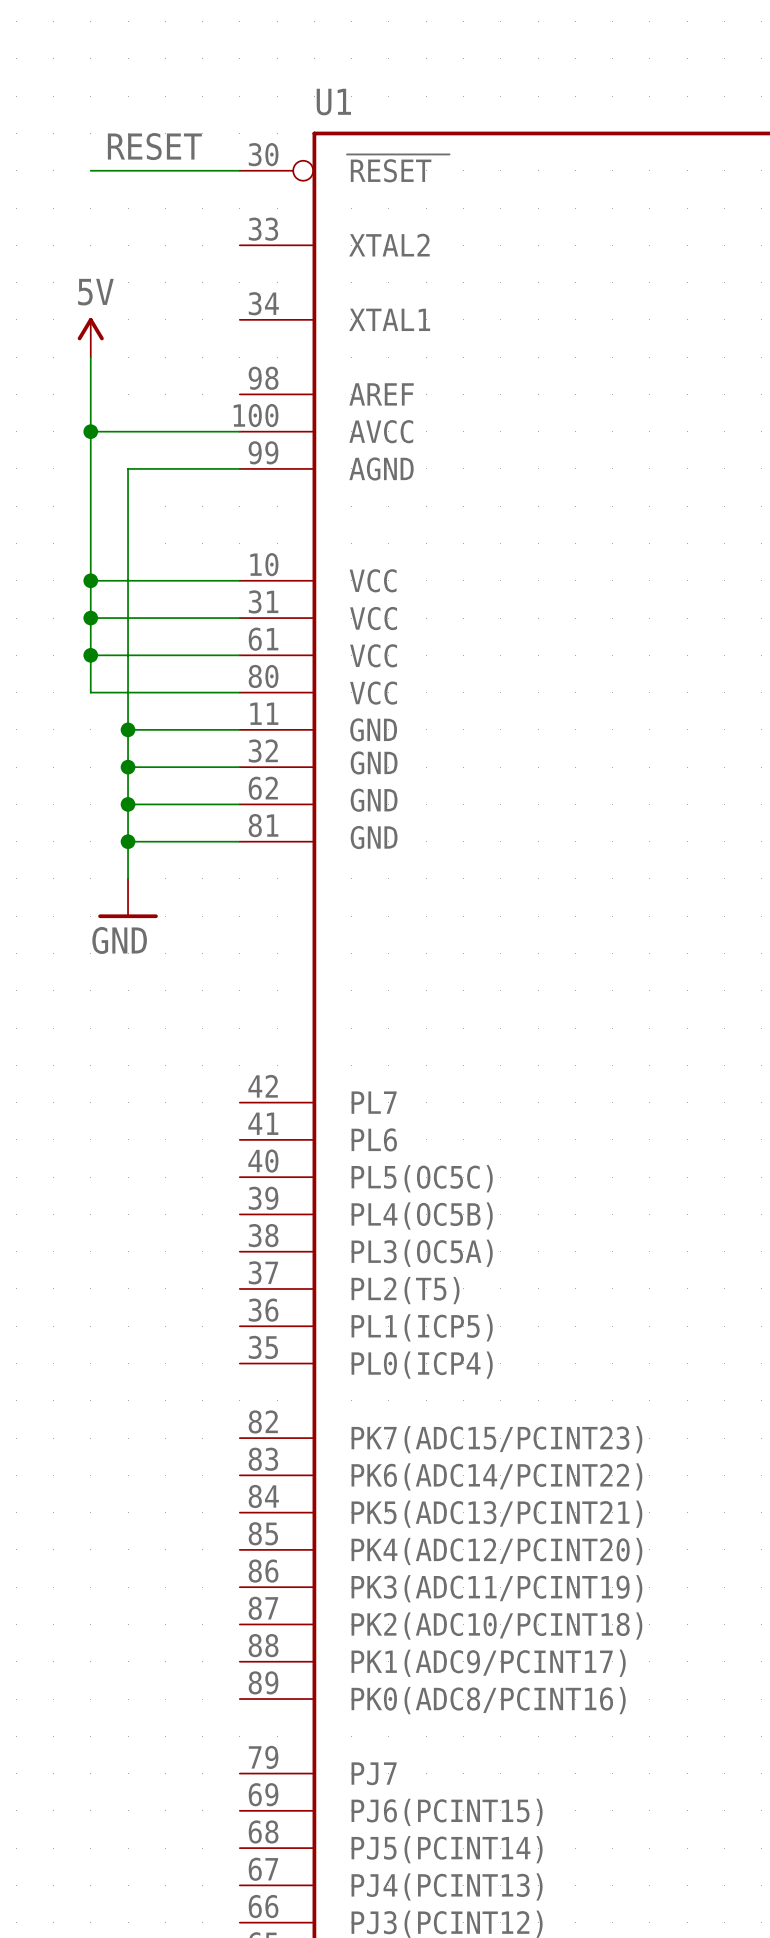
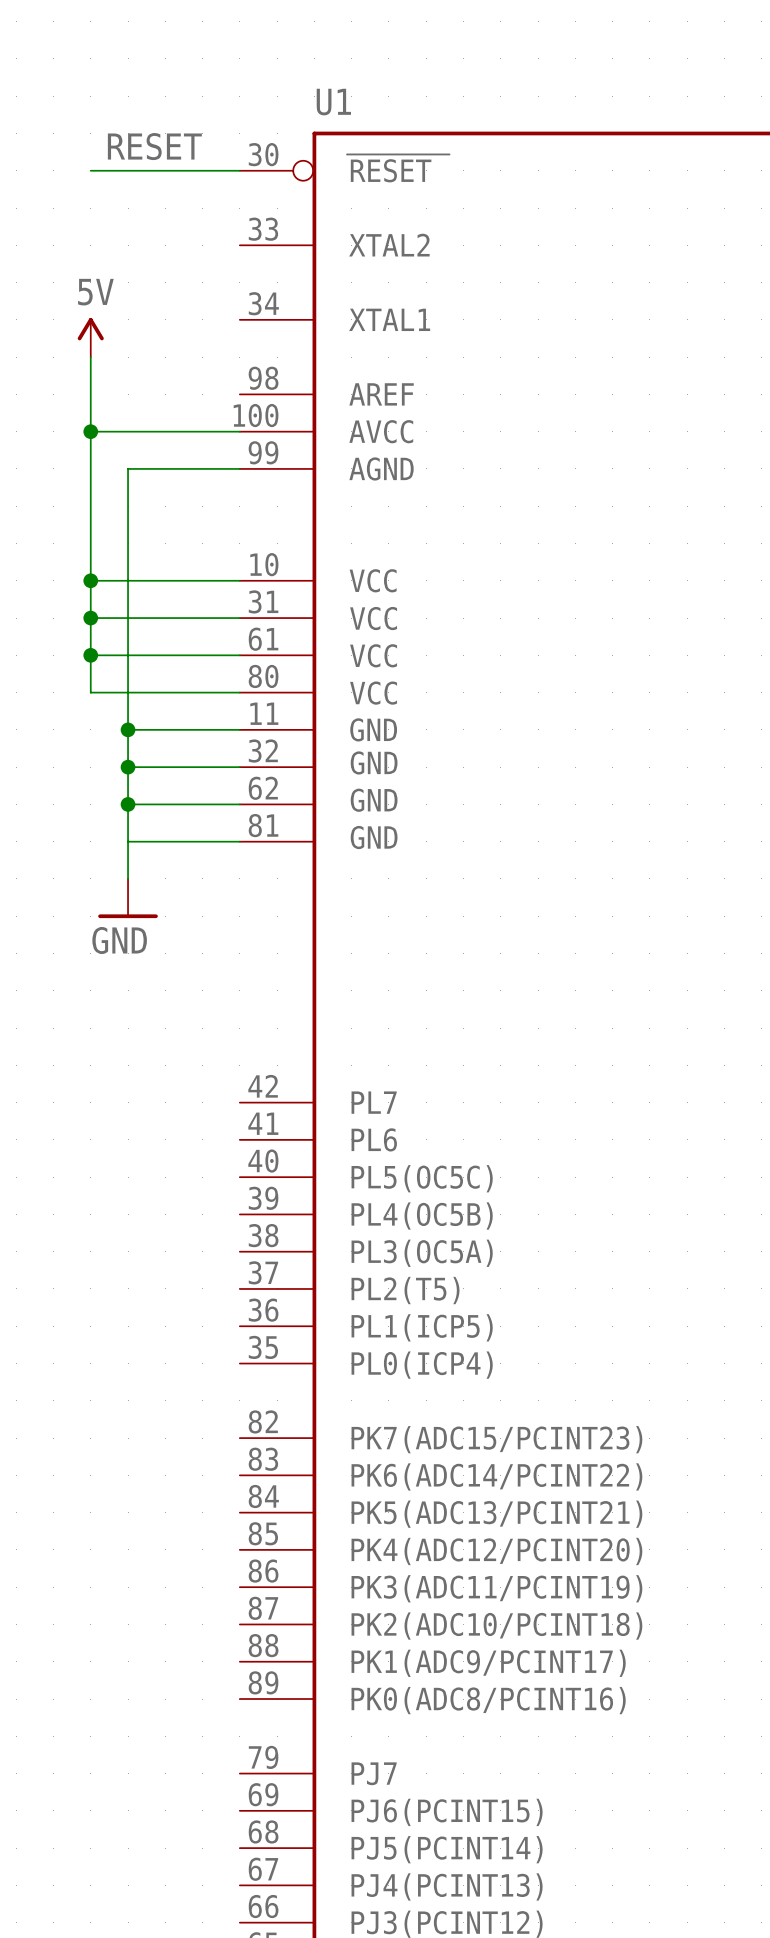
junction: (128, 841) -> none

